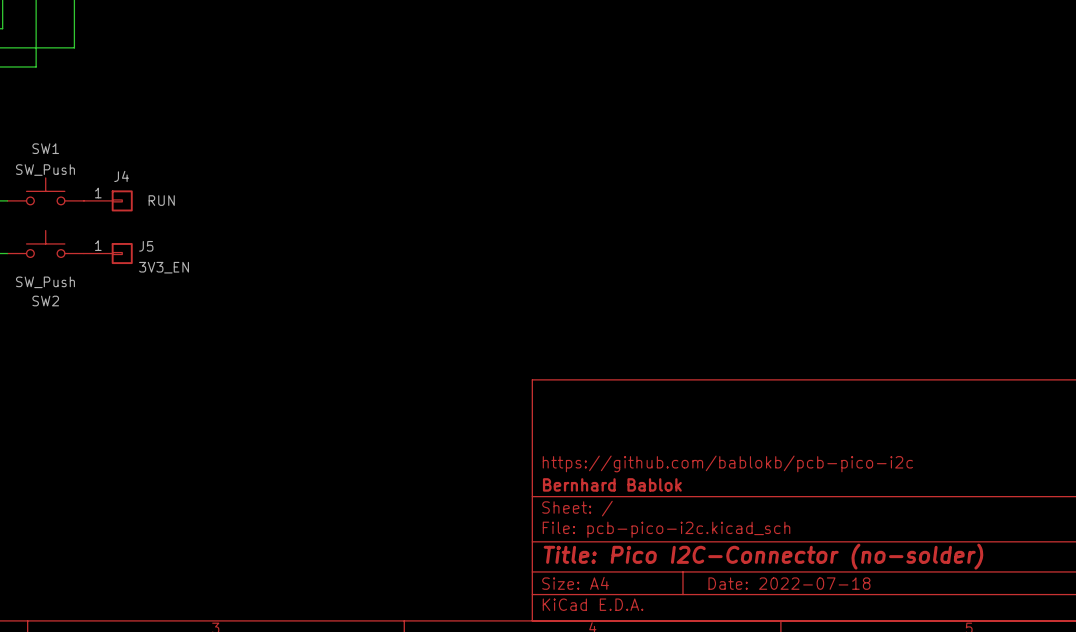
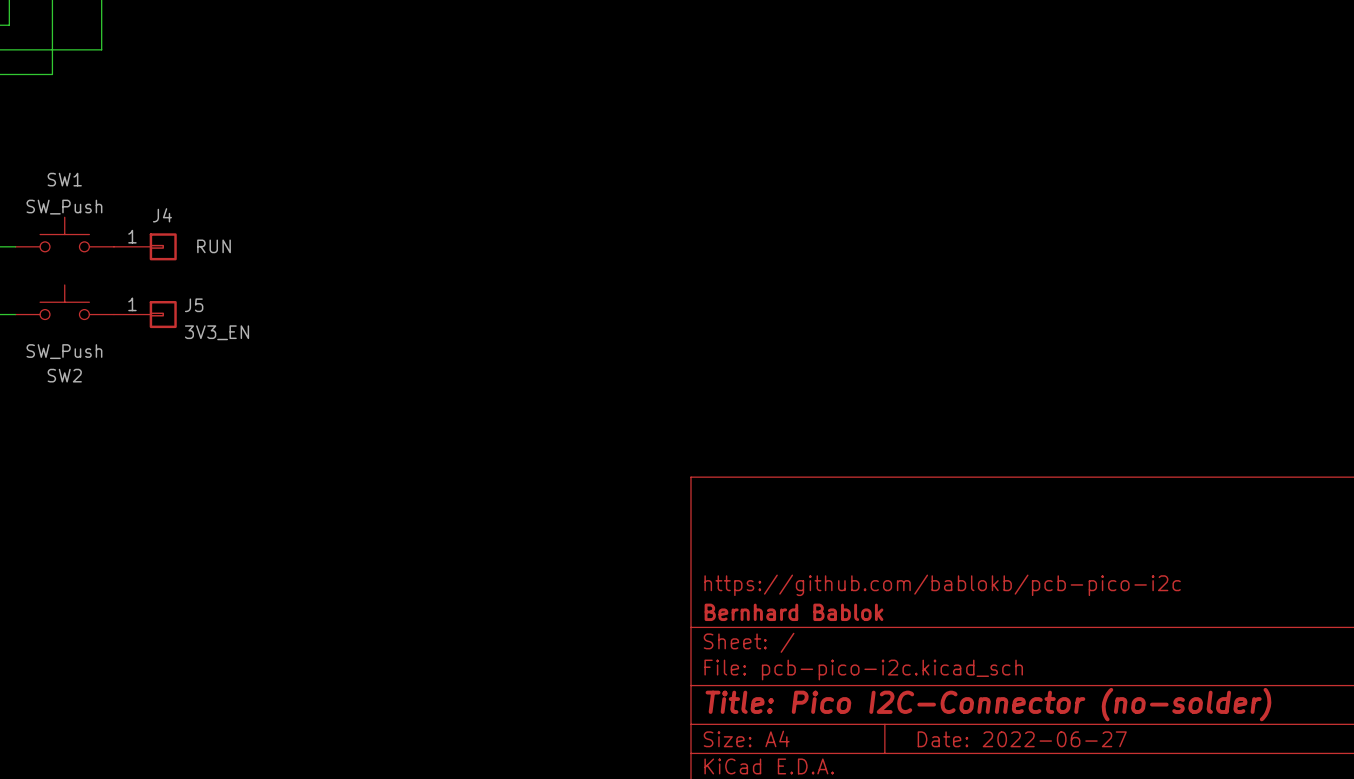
title block: Date: 2022-07-18 (789, 583) -> Date: 2022-06-27 (1022, 739)

